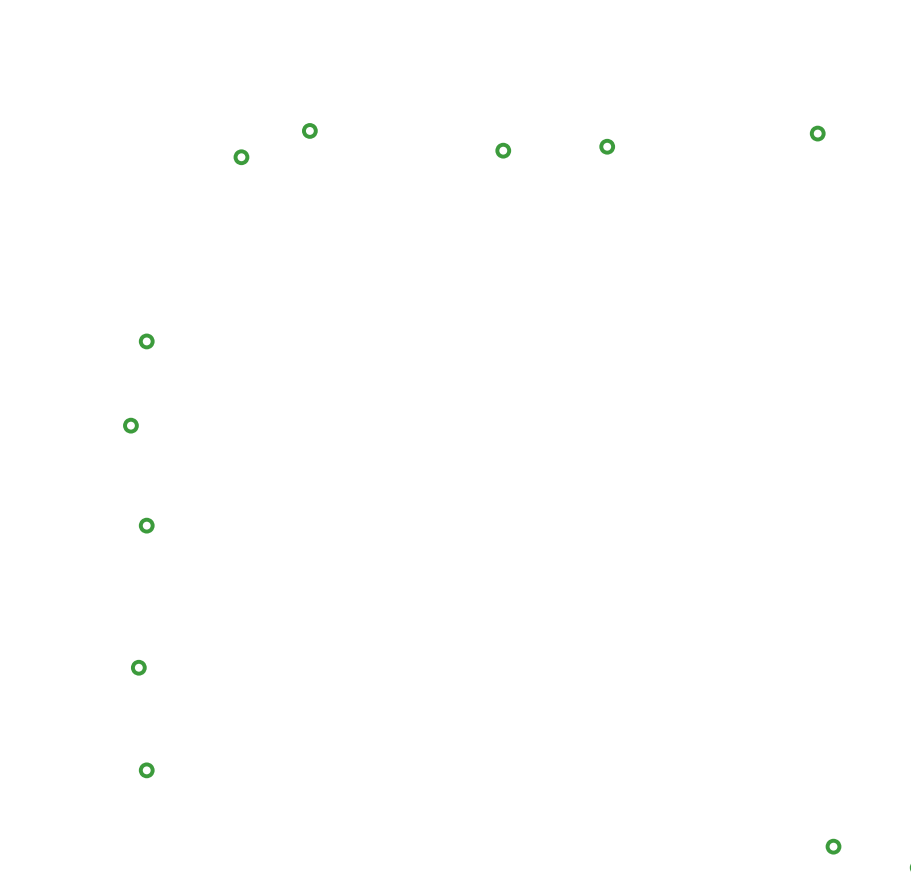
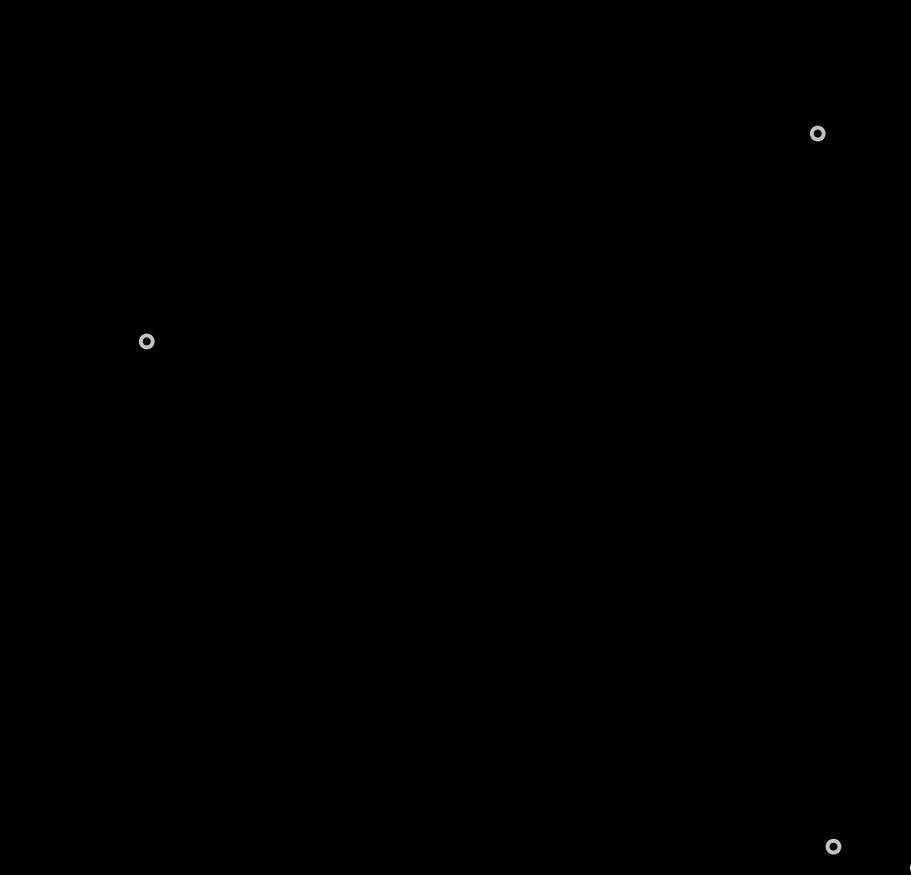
via: (309, 130) -> none
via: (607, 146) -> none
via: (503, 150) -> none
via: (241, 157) -> none
via: (130, 425) -> none
via: (146, 525) -> none
via: (138, 667) -> none
via: (146, 770) -> none

